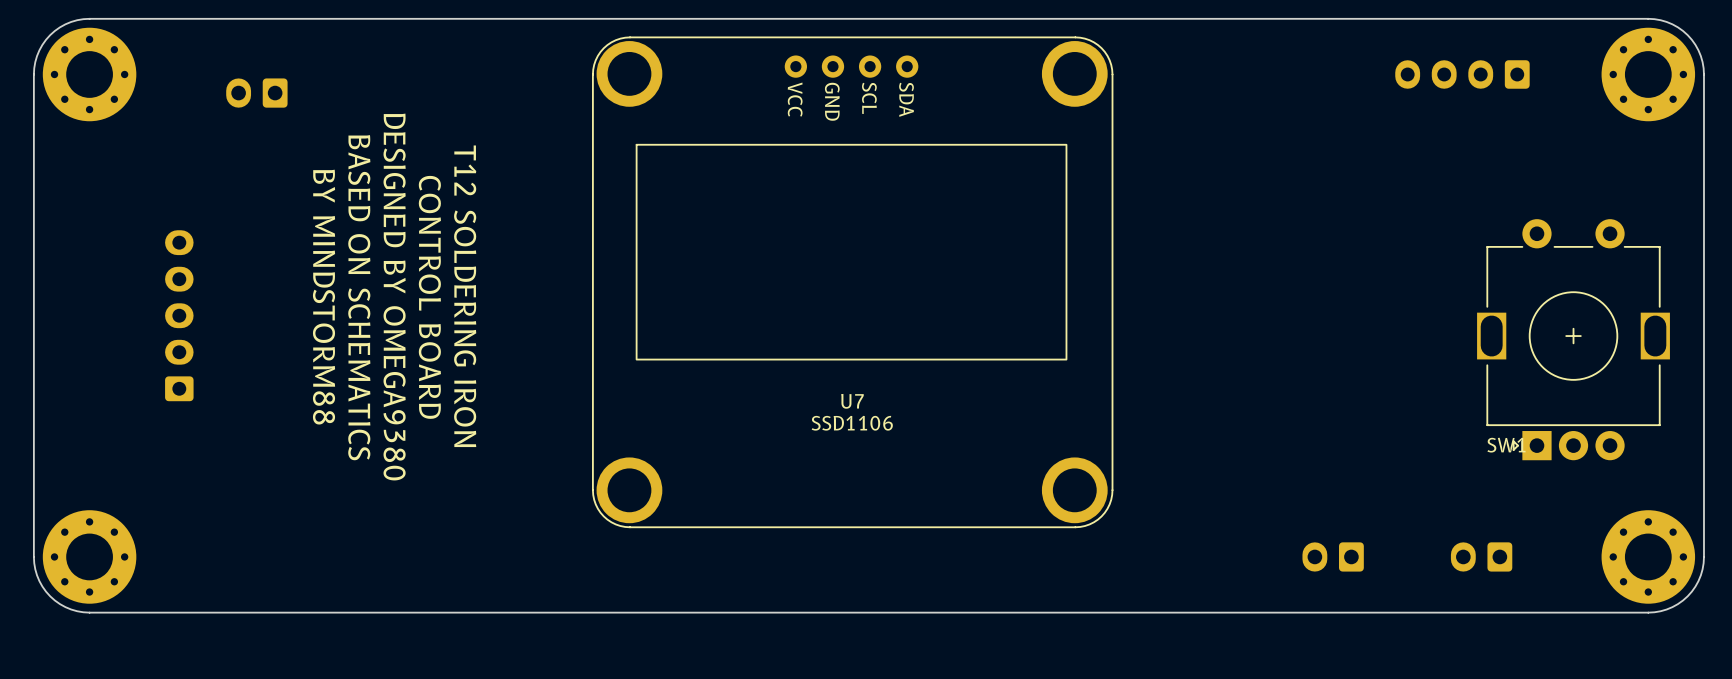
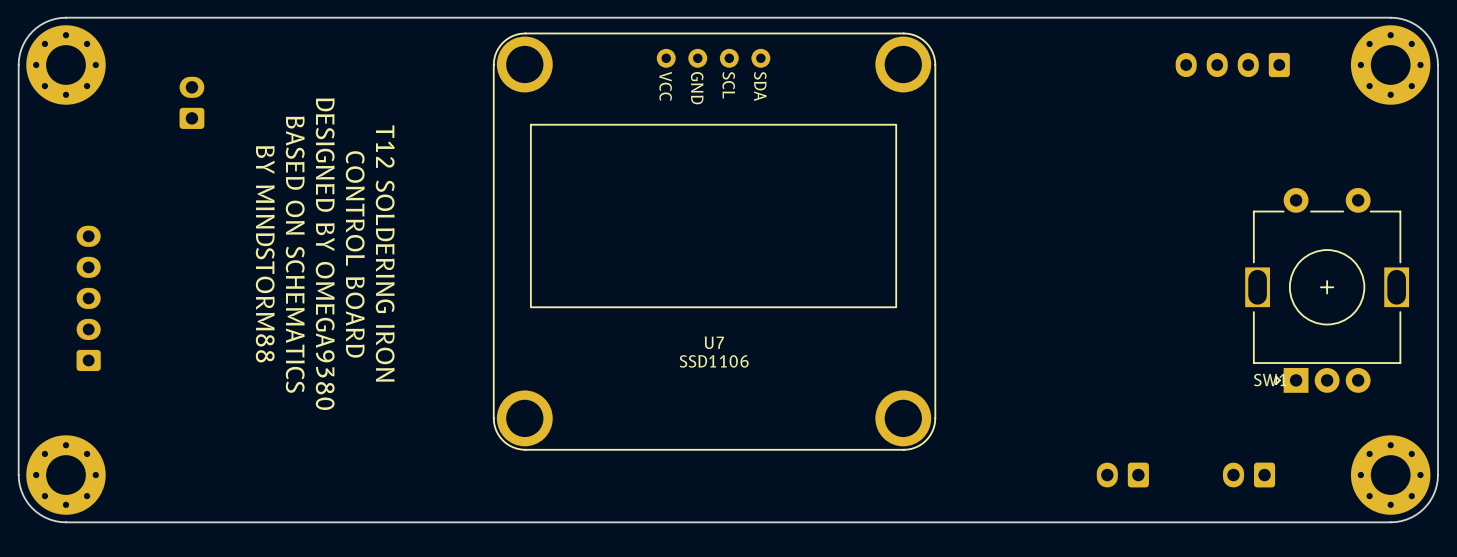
part rotation: 0° (256, 93) -> 90° clockwise (191, 102)
part position: (179, 315) -> (88, 298)

